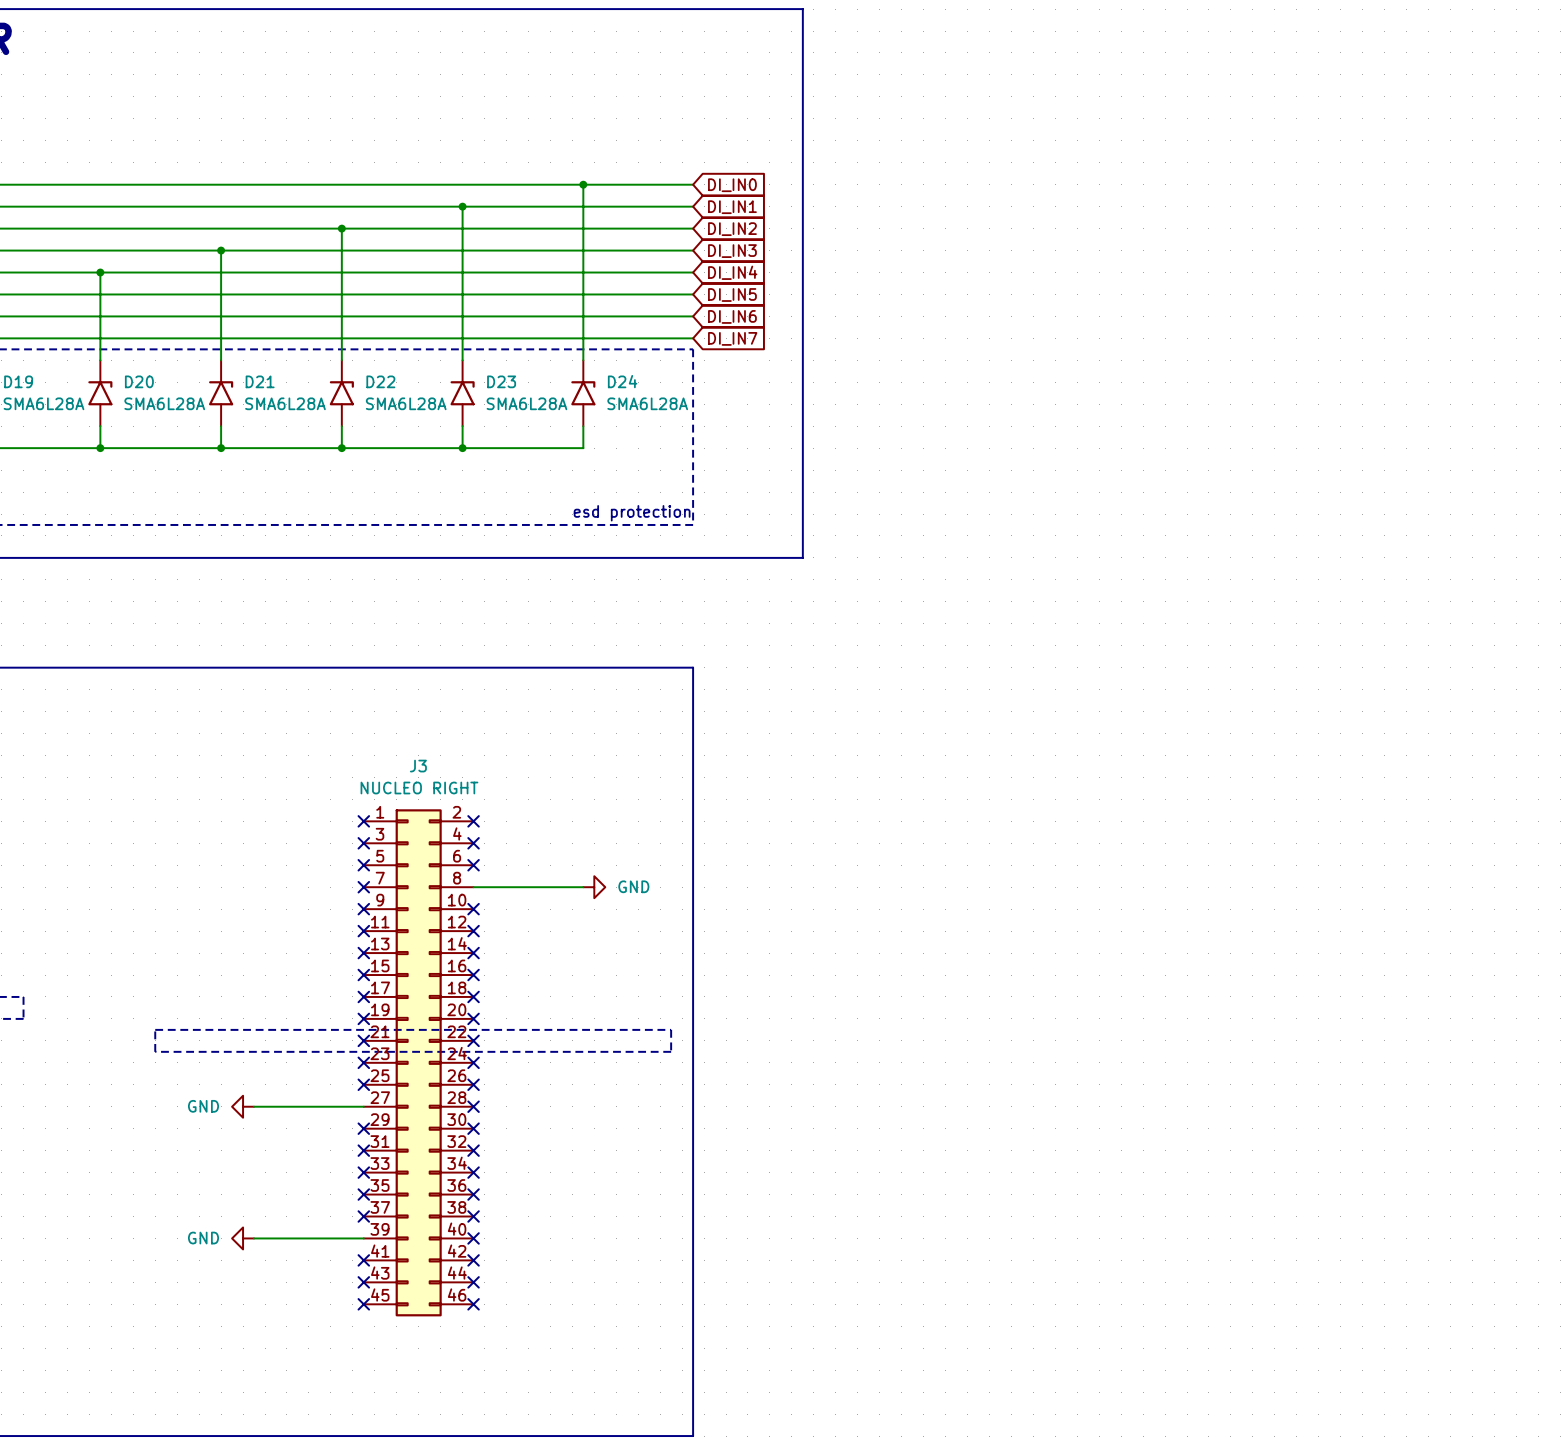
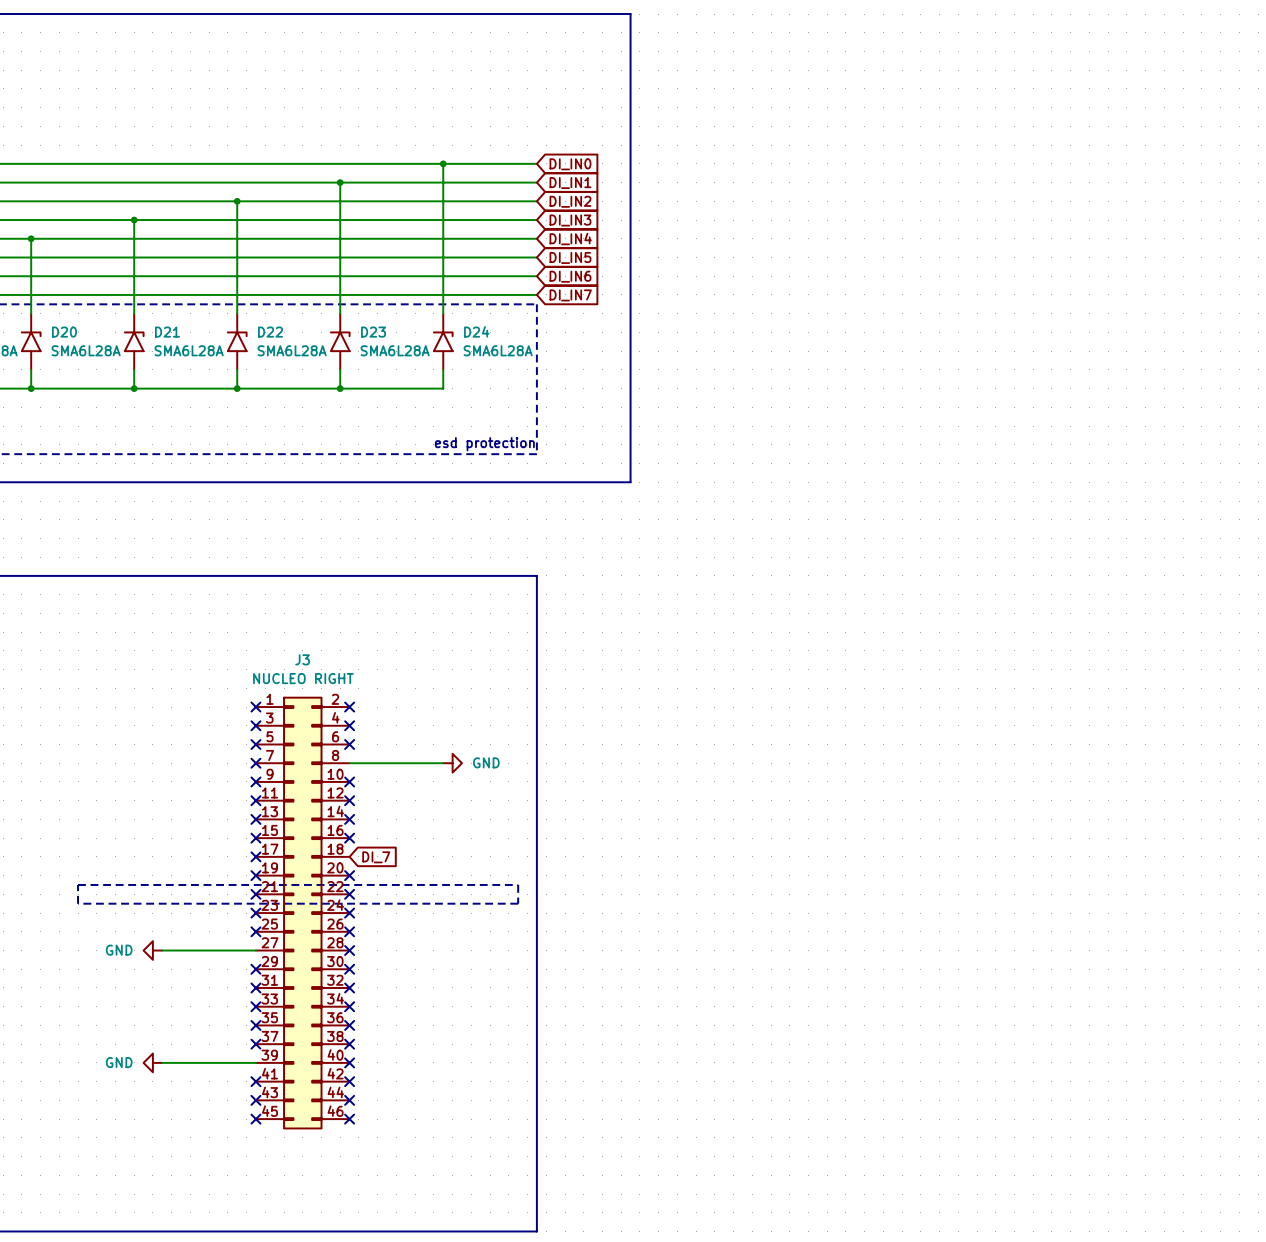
no-connect mark: (473, 996) -> none
global label: none -> DI_7 (376, 857)

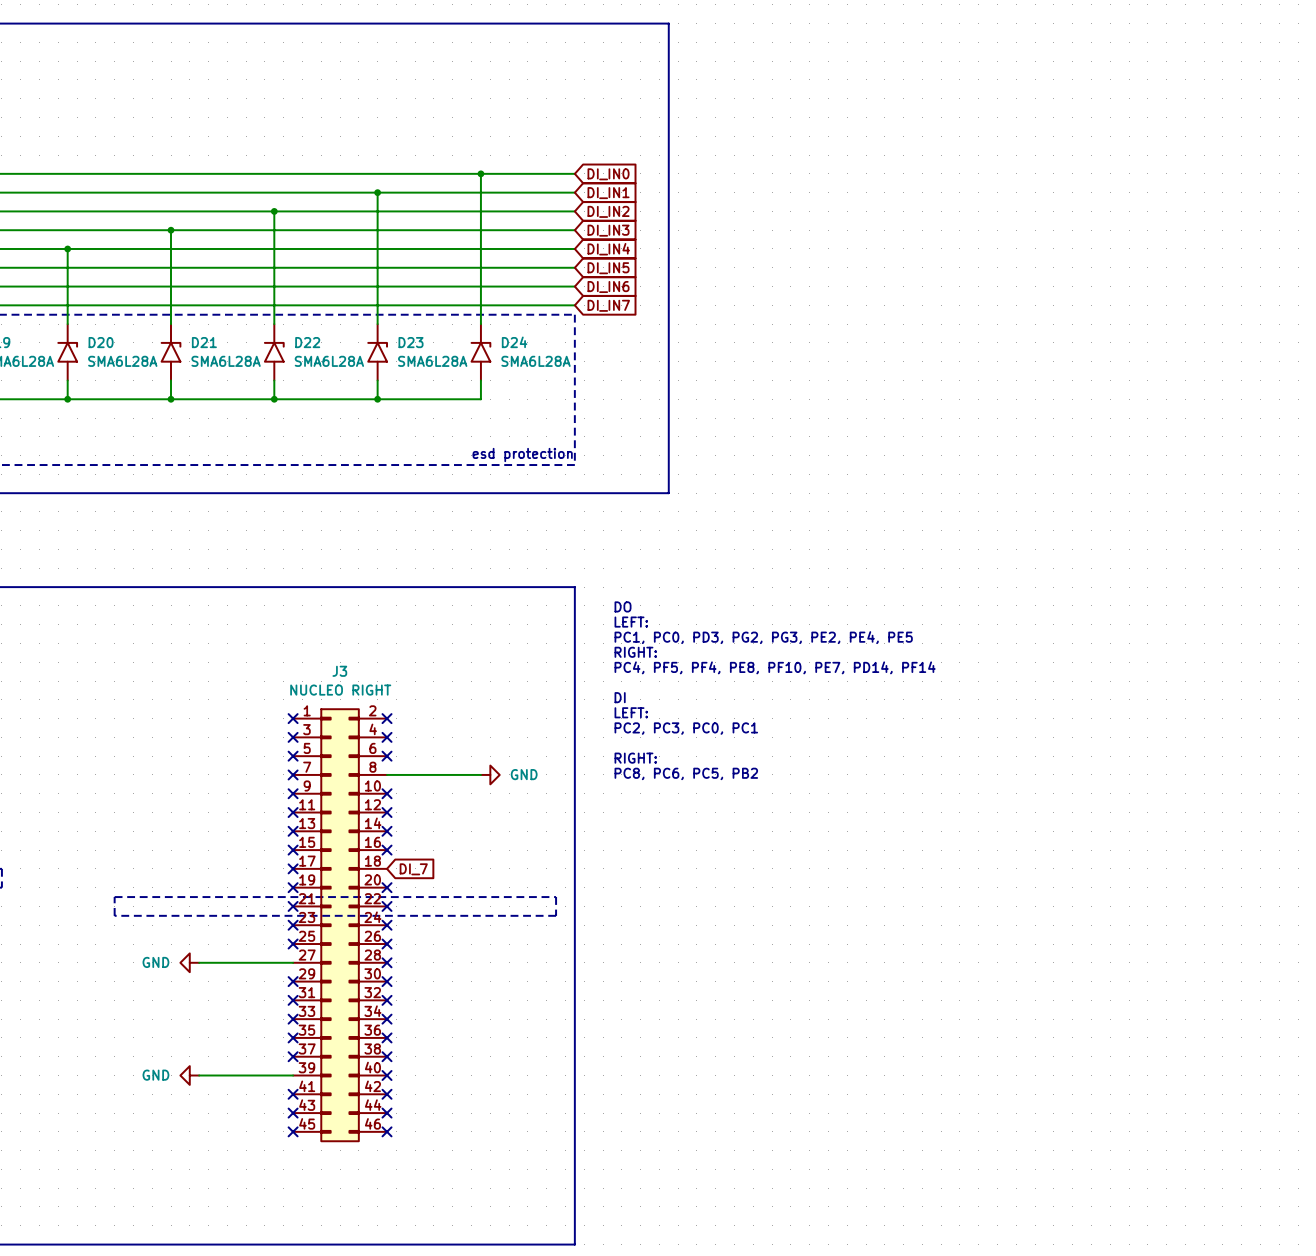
text: none -> DO (623, 606)
text: none -> LEFT: (631, 622)
text: none -> PC1, PC0, PD3, PG2, PG3, PE2, PE4, PE5 (763, 637)
text: none -> RIGHT: (635, 652)
text: none -> PC4, PF5, PF4, PE8, PF10, PE7, PD14, PF14 (775, 667)
text: none -> DI (620, 697)
text: none -> LEFT: (631, 712)
text: none -> PC2, PC3, PC0, PC1 (686, 728)
text: none -> RIGHT: (635, 758)
text: none -> PC8, PC6, PC5, PB2 (686, 773)

